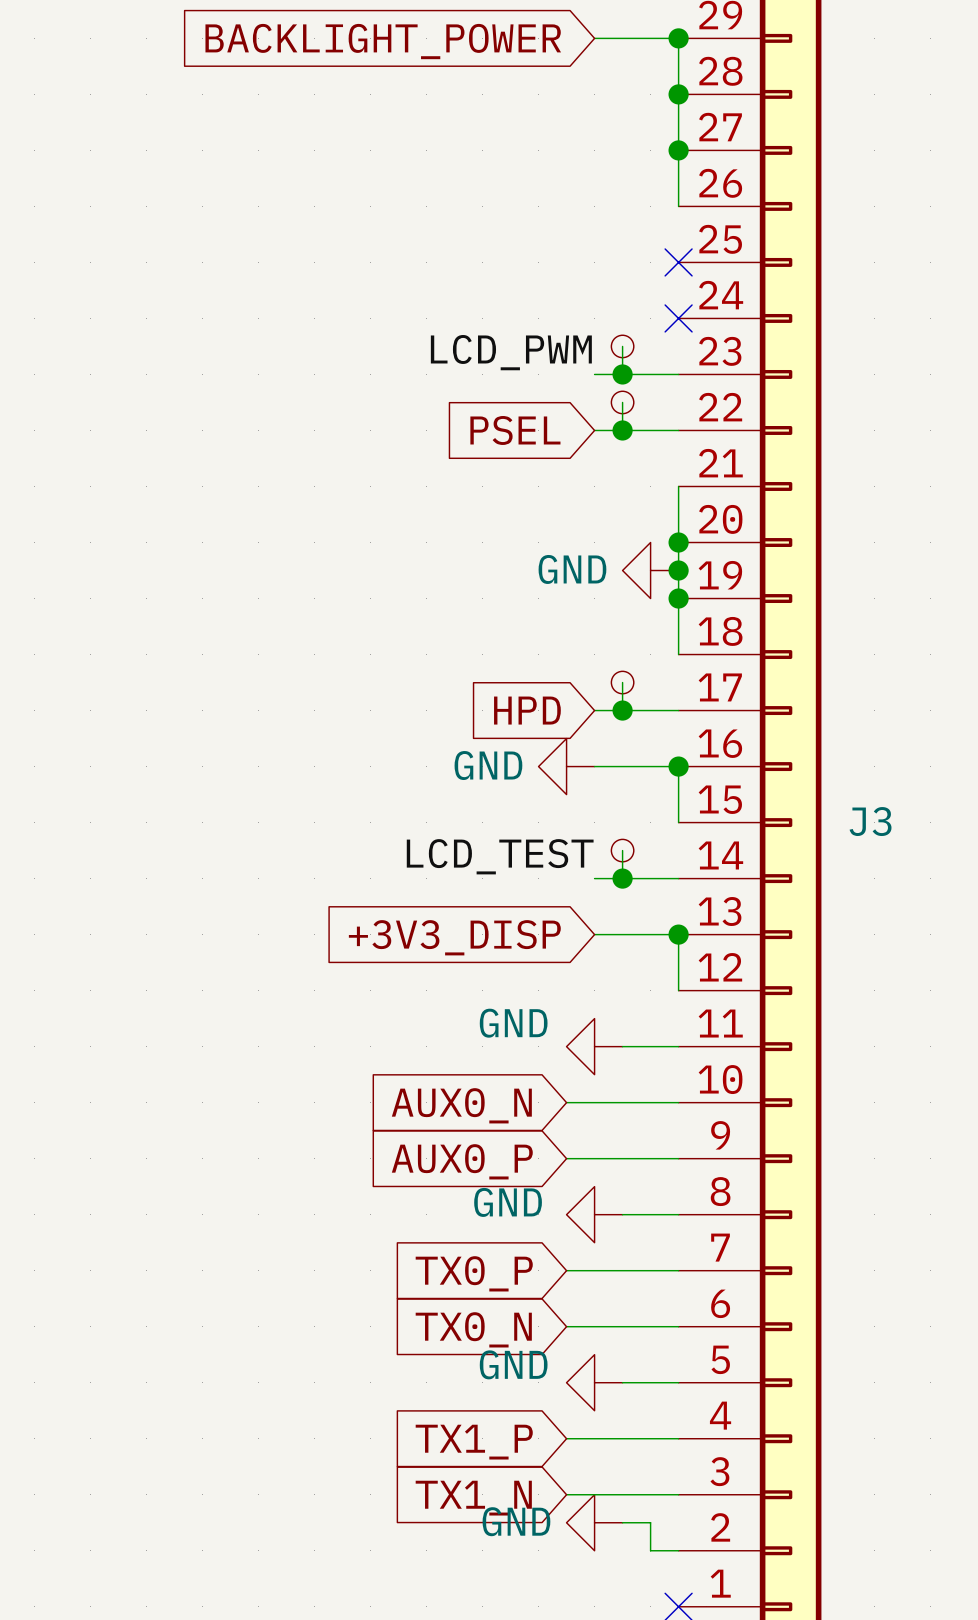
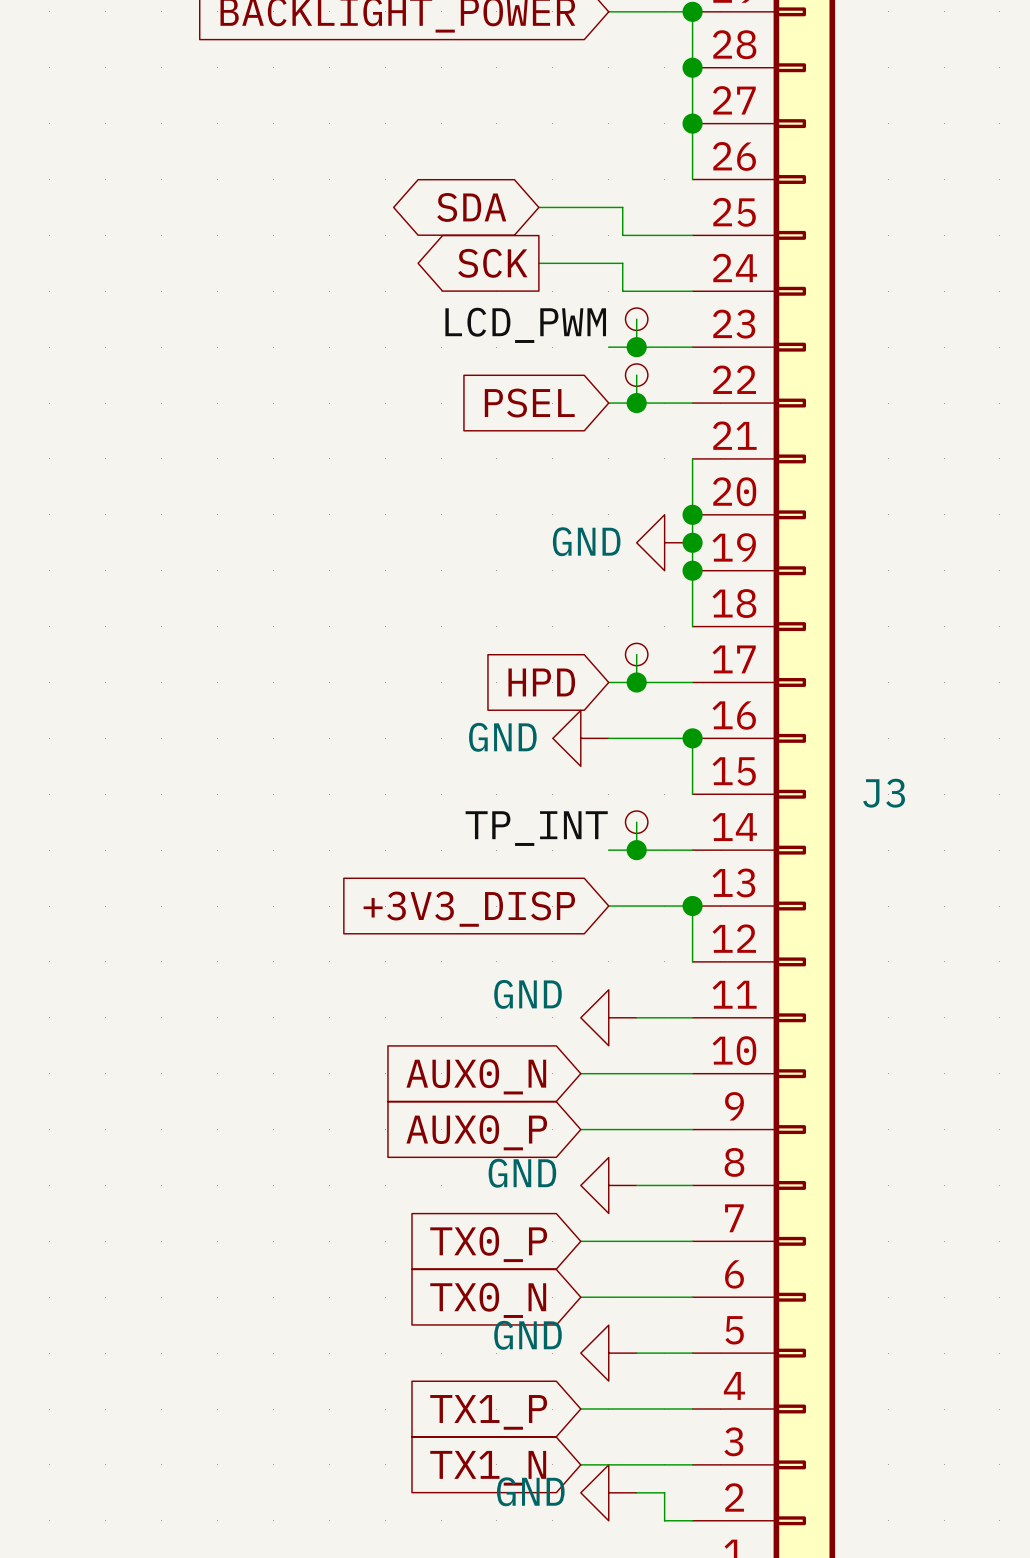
global label: none -> SDA (471, 207)
wire: none -> (538, 207) (622, 207) (622, 235) (692, 235)
no-connect mark: (678, 262) -> none
global label: none -> SCK (492, 263)
wire: none -> (538, 263) (622, 263) (622, 291) (692, 291)
no-connect mark: (678, 318) -> none
label: LCD_TEST (500, 856) -> TP_INT (536, 828)

